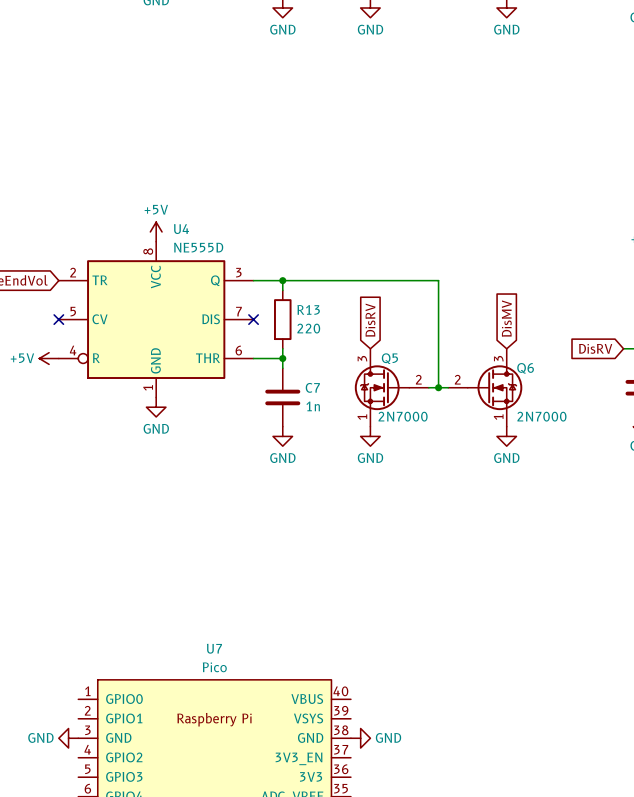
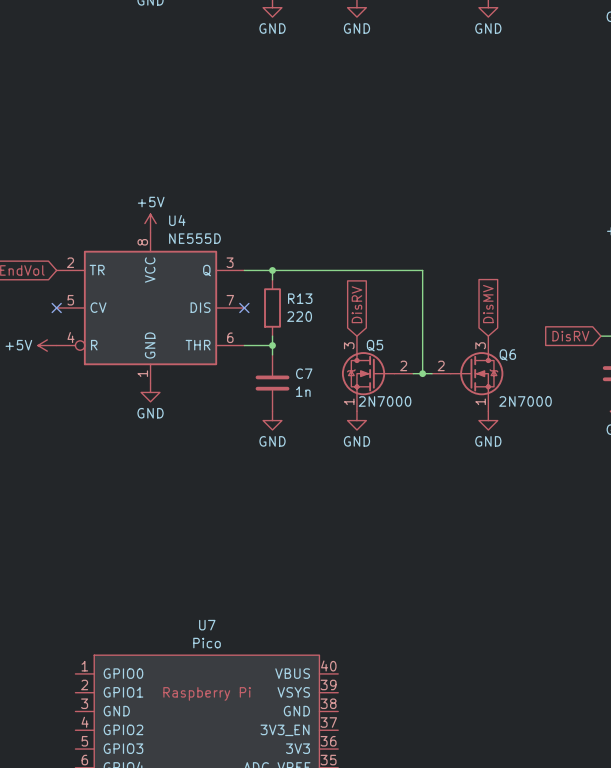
power symbol: GND (68, 738) -> none
power symbol: GND (360, 738) -> none

